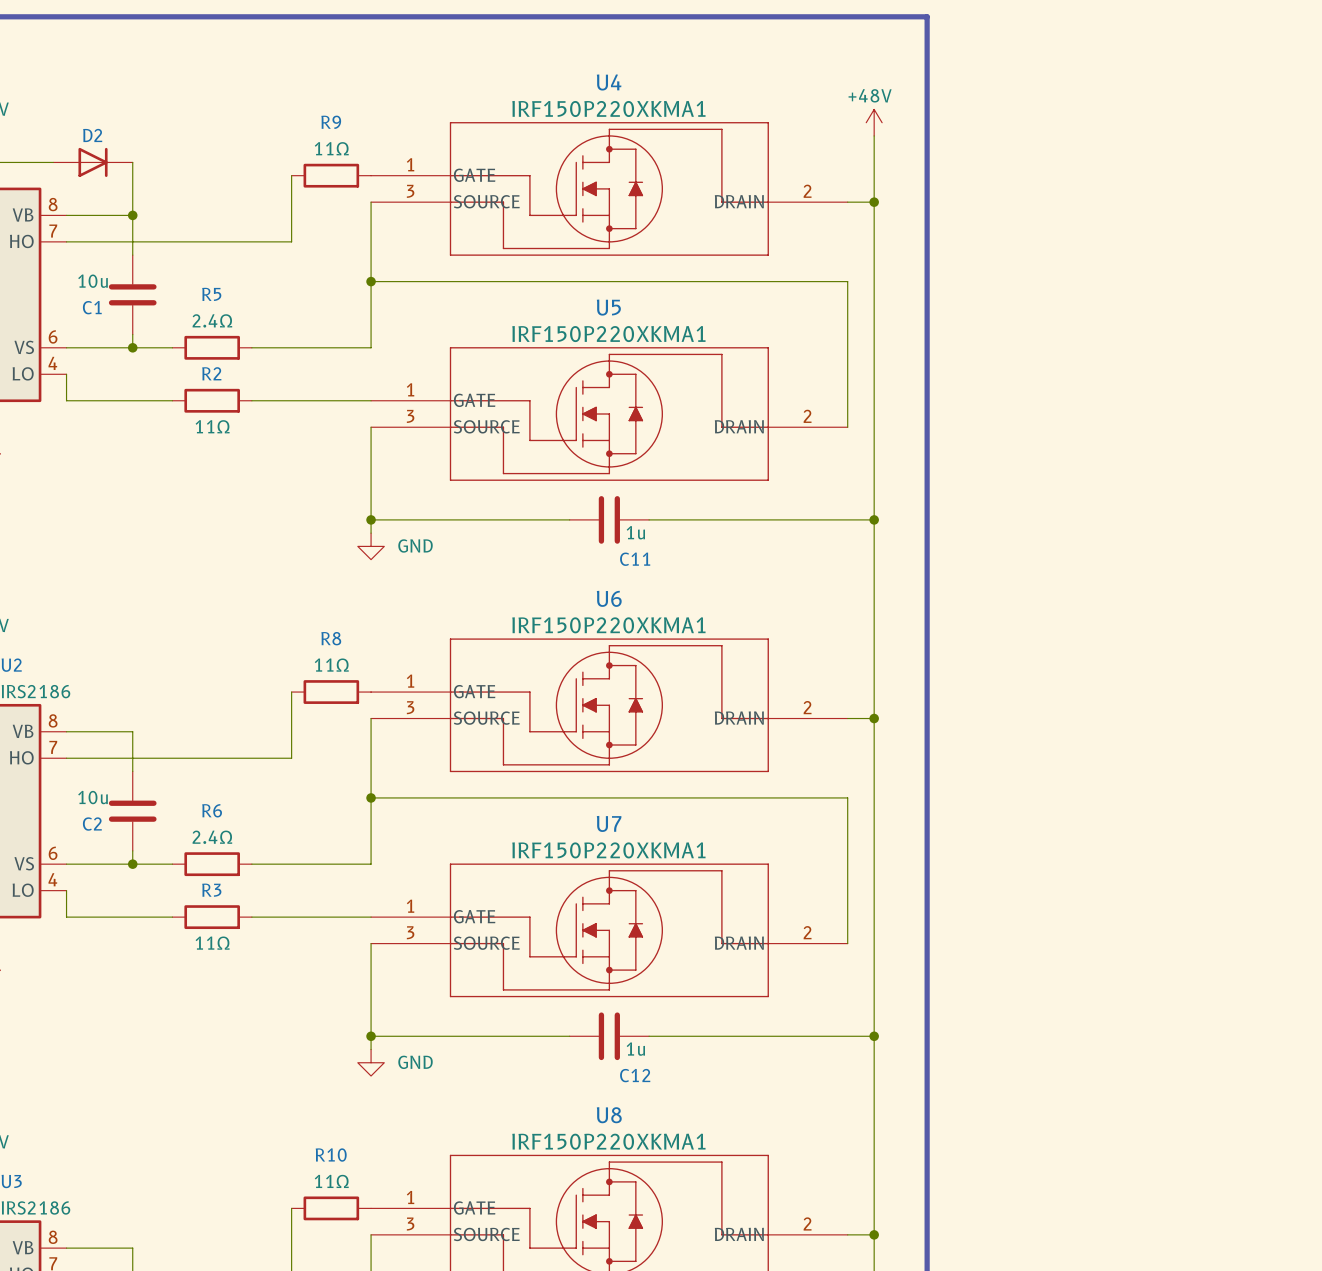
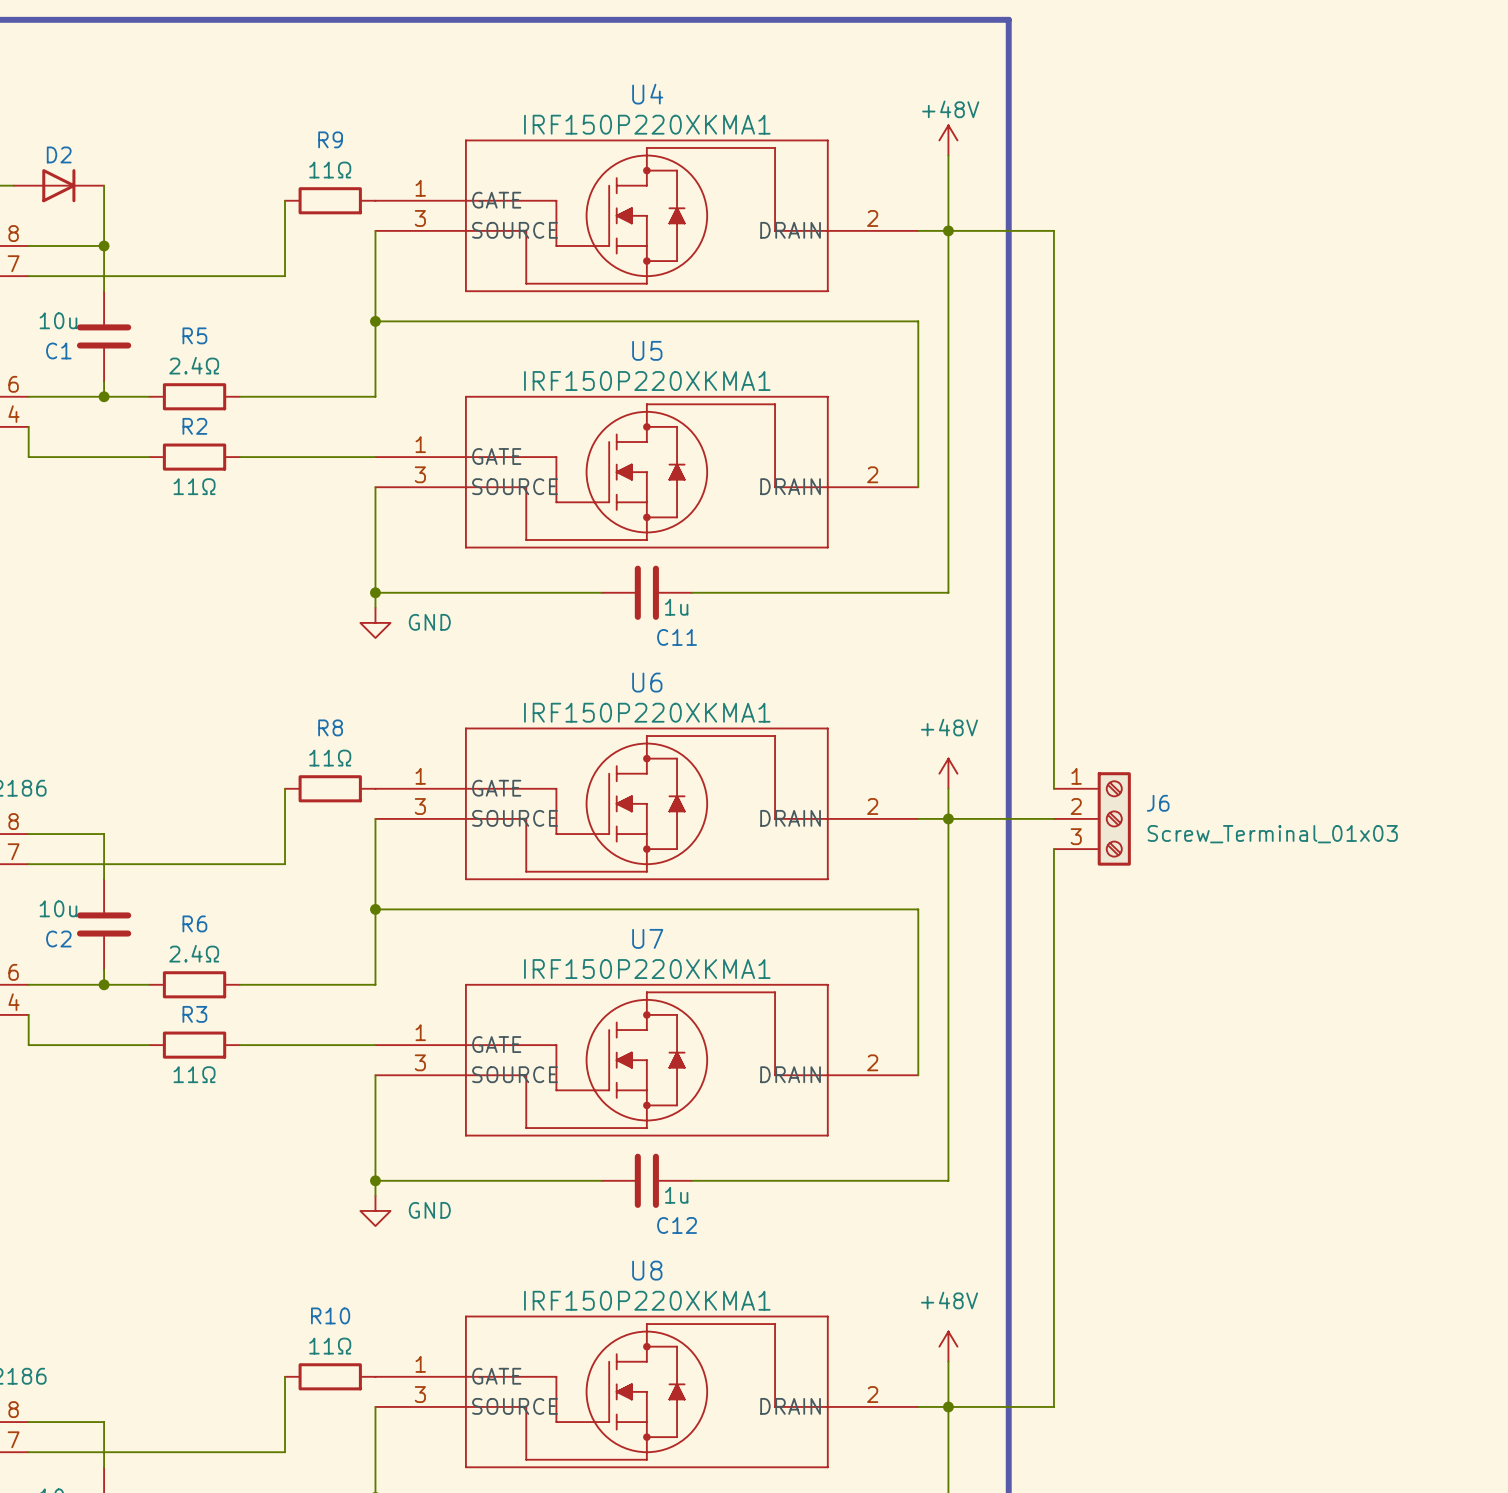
wire: none -> (948, 230) (1053, 230) (1053, 788)
wire: (874, 519) (874, 692) -> none
junction: (874, 519) -> none
power symbol: none -> +48V (948, 773)
wire: none -> (948, 818) (1053, 818)
J6: none -> Screw_Terminal_01x03 (1092, 818)
wire: none -> (1053, 849) (1053, 1406) (948, 1406)
wire: (874, 1036) (874, 1195) -> none
junction: (874, 1036) -> none
power symbol: none -> +48V (948, 1346)

